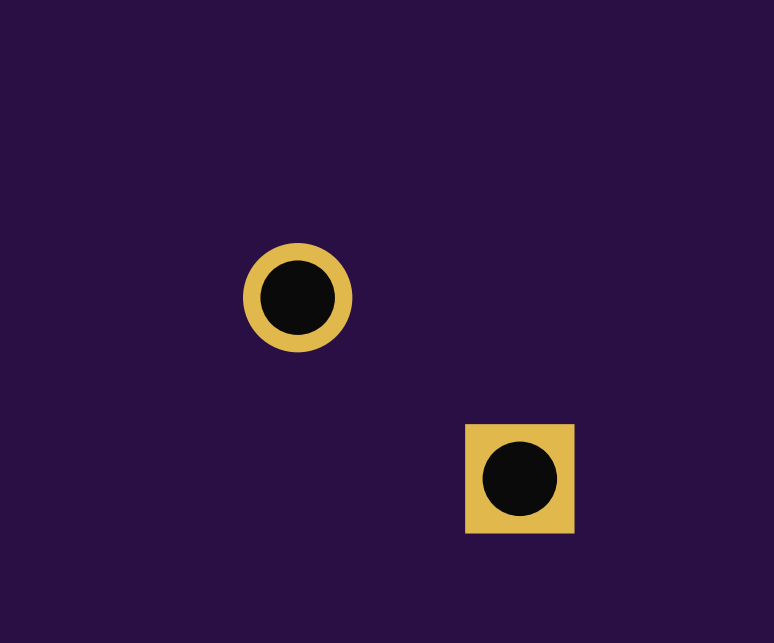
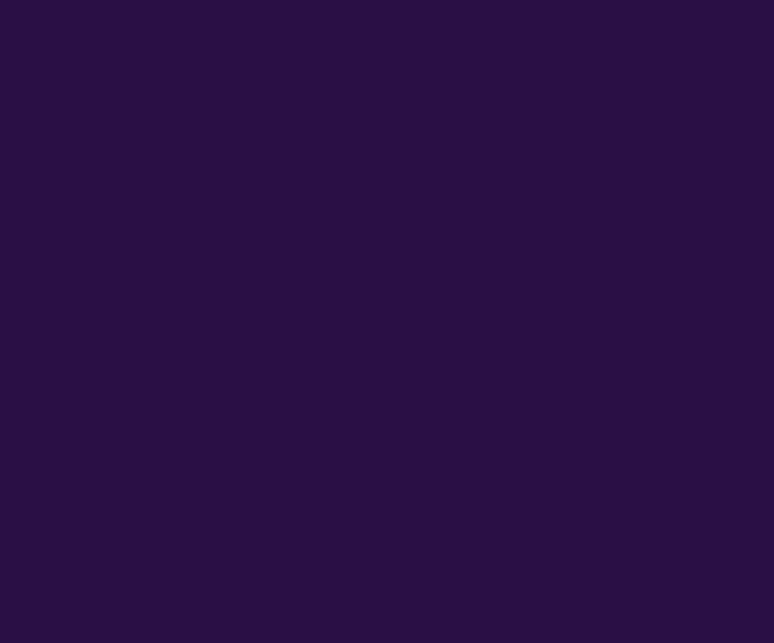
part: (408, 388) -> none

